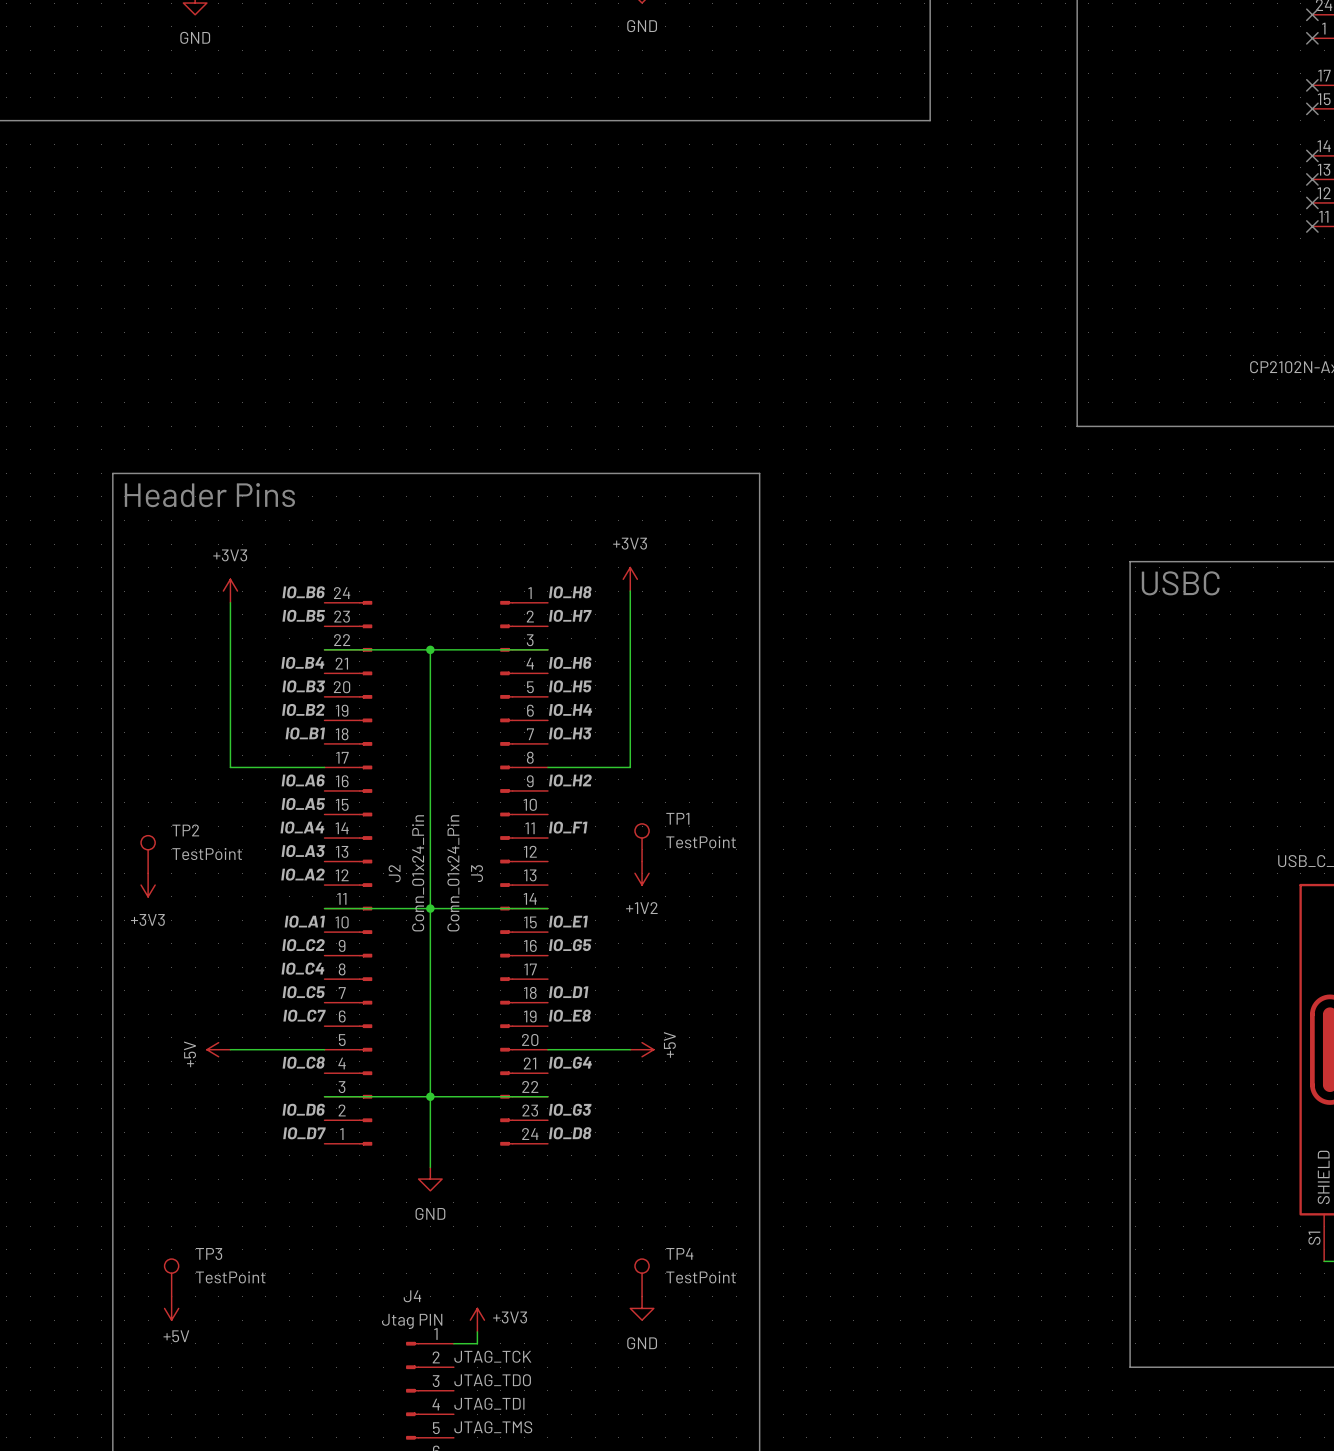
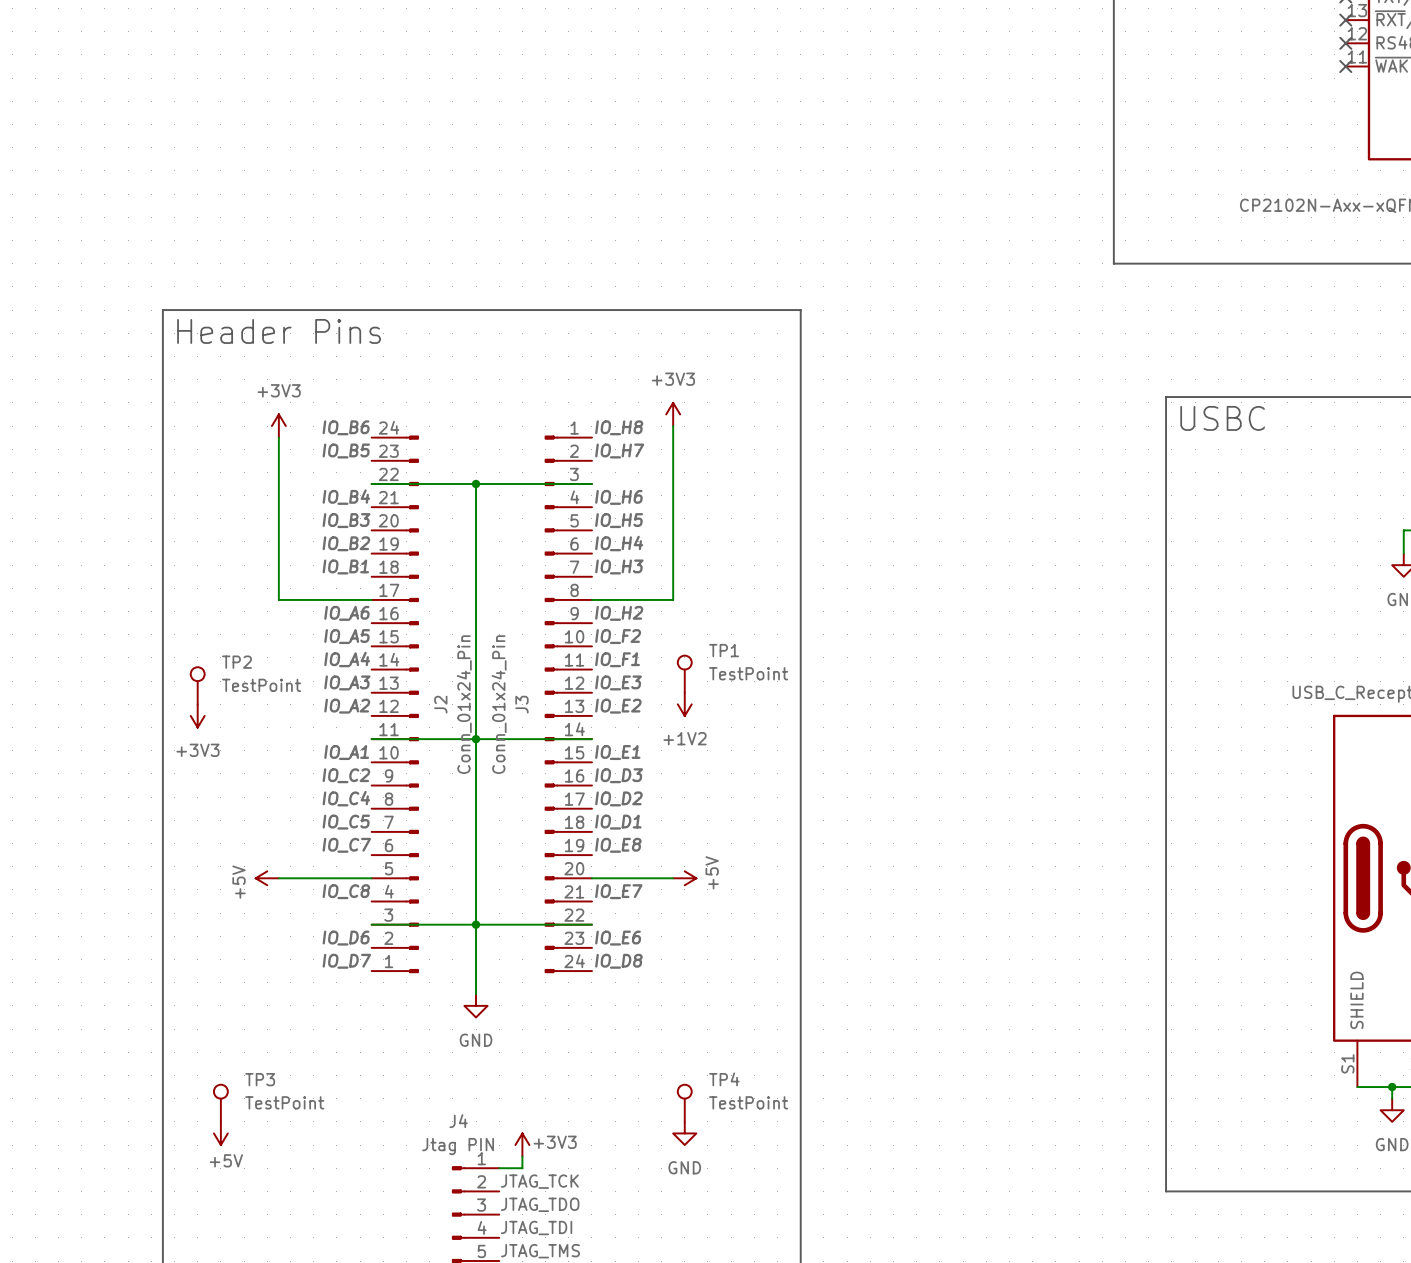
label: none -> IO_F2 (618, 636)
label: none -> IO_E3 (618, 682)
label: none -> IO_E2 (618, 706)
label: IO_G5 (570, 945) -> IO_D3 (619, 775)
label: none -> IO_D2 (618, 798)
label: IO_G4 (570, 1062) -> IO_E7 (618, 891)
label: IO_G3 (570, 1109) -> IO_E6 (618, 938)

